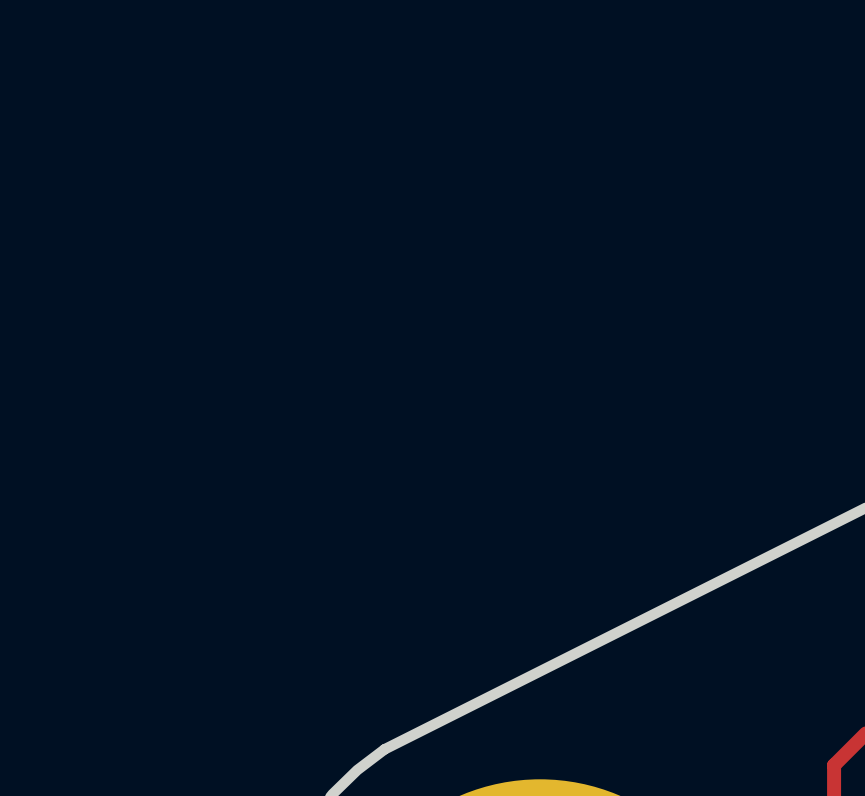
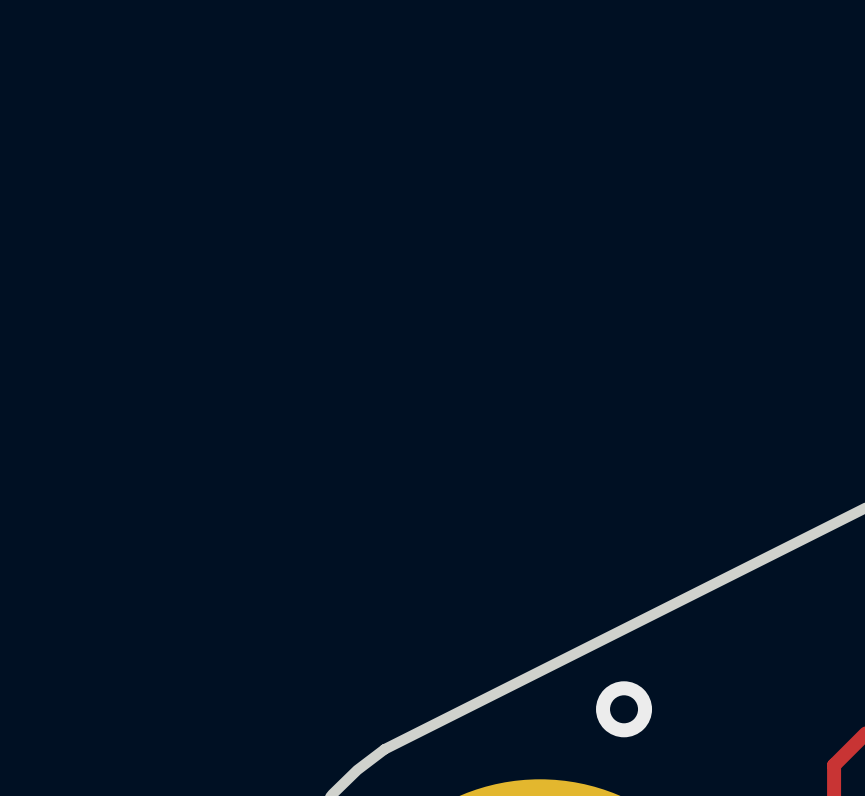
via: none -> (624, 709)

